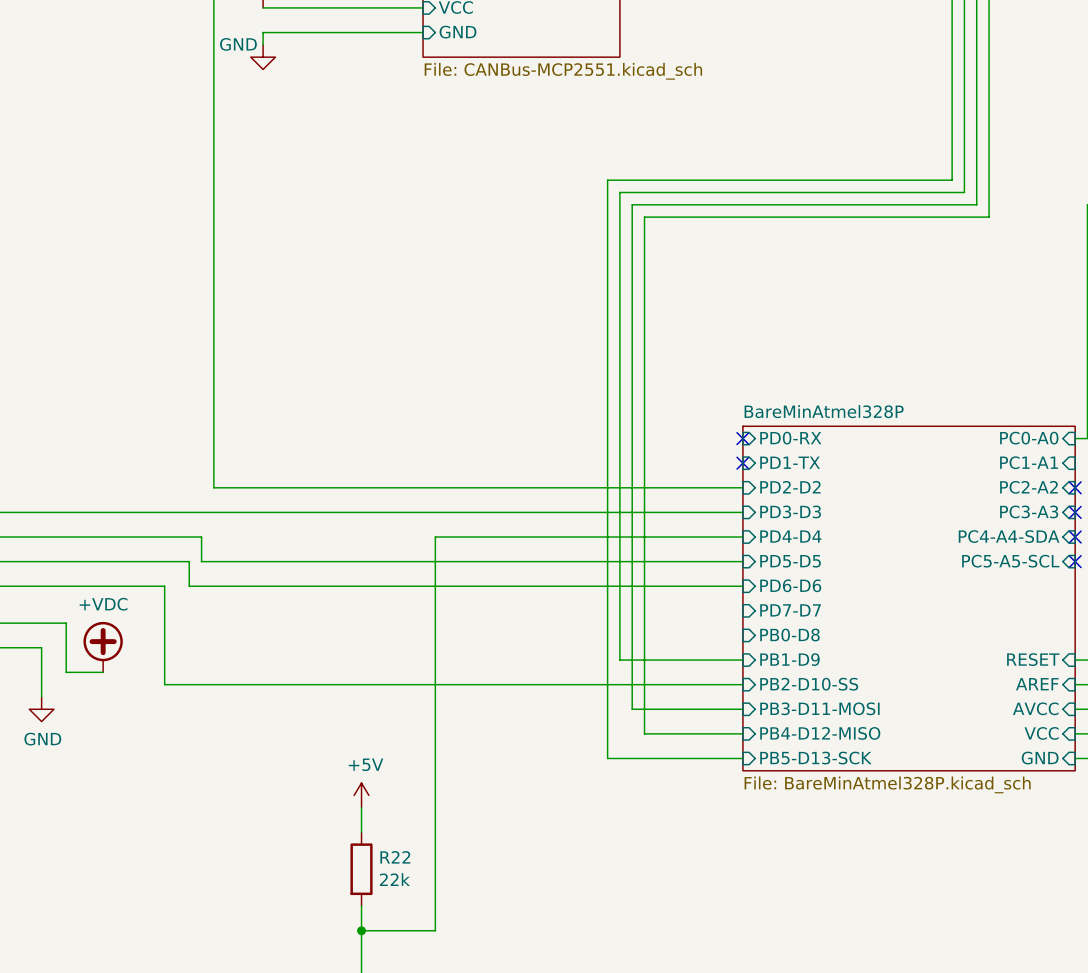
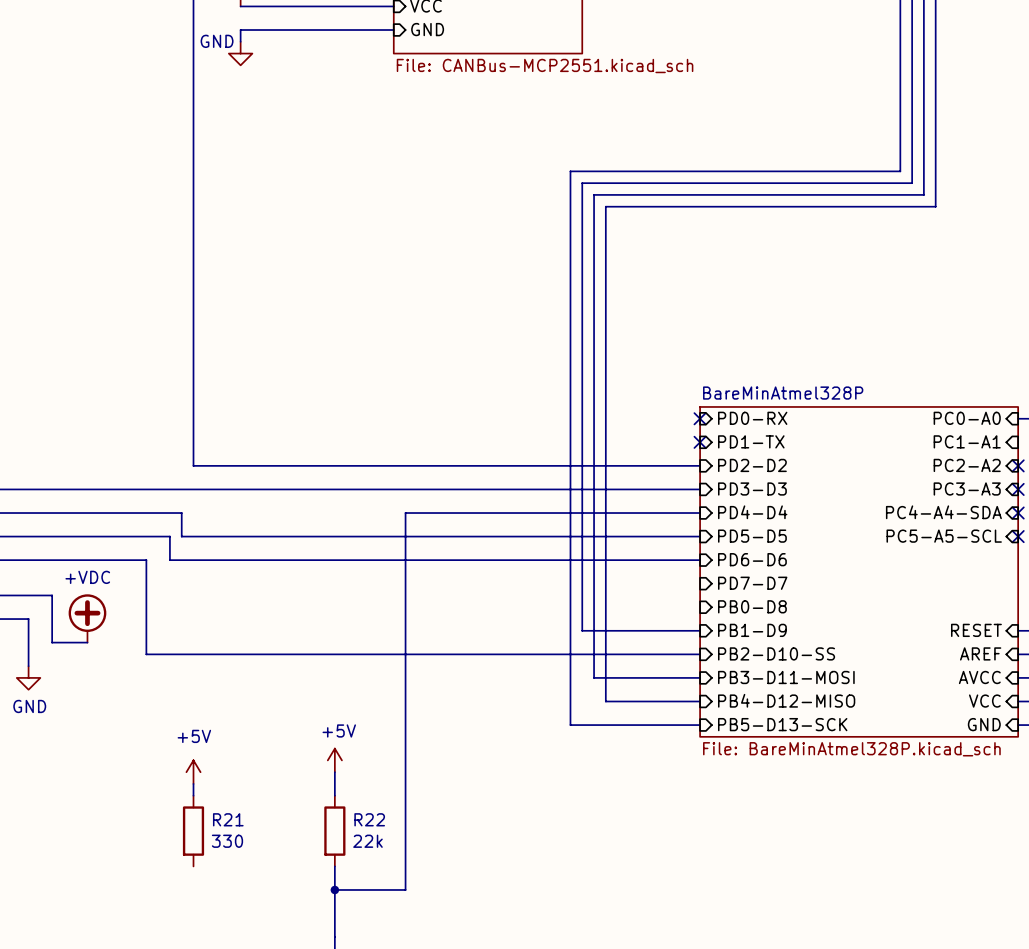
power symbol: none -> +5V (193, 772)
wire: none -> (193, 783) (193, 795)
R21: none -> 330 (193, 831)

